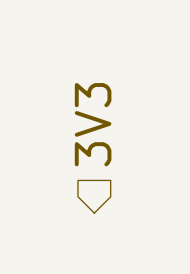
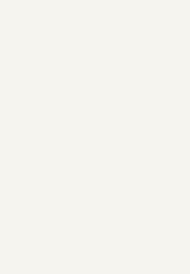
hierarchical label: 3V3 (93, 124) -> none

